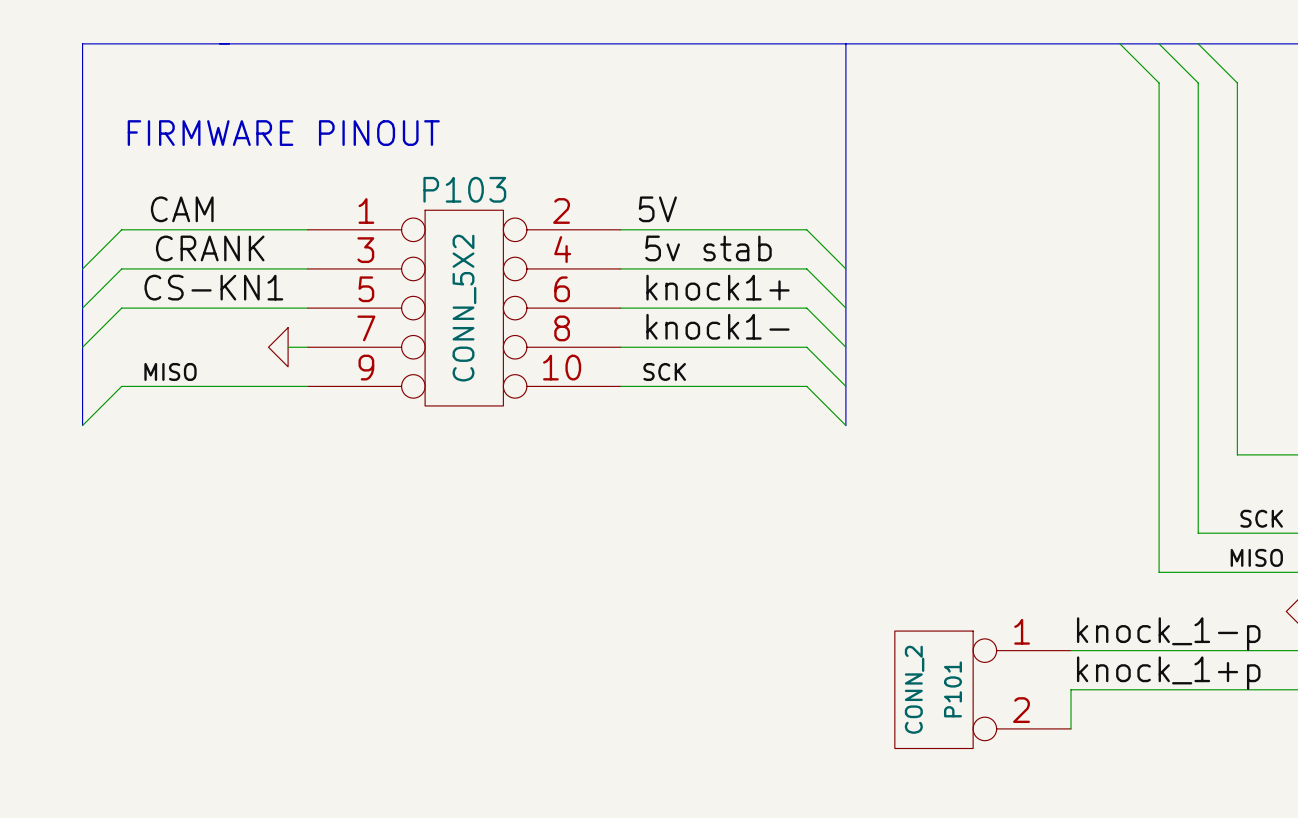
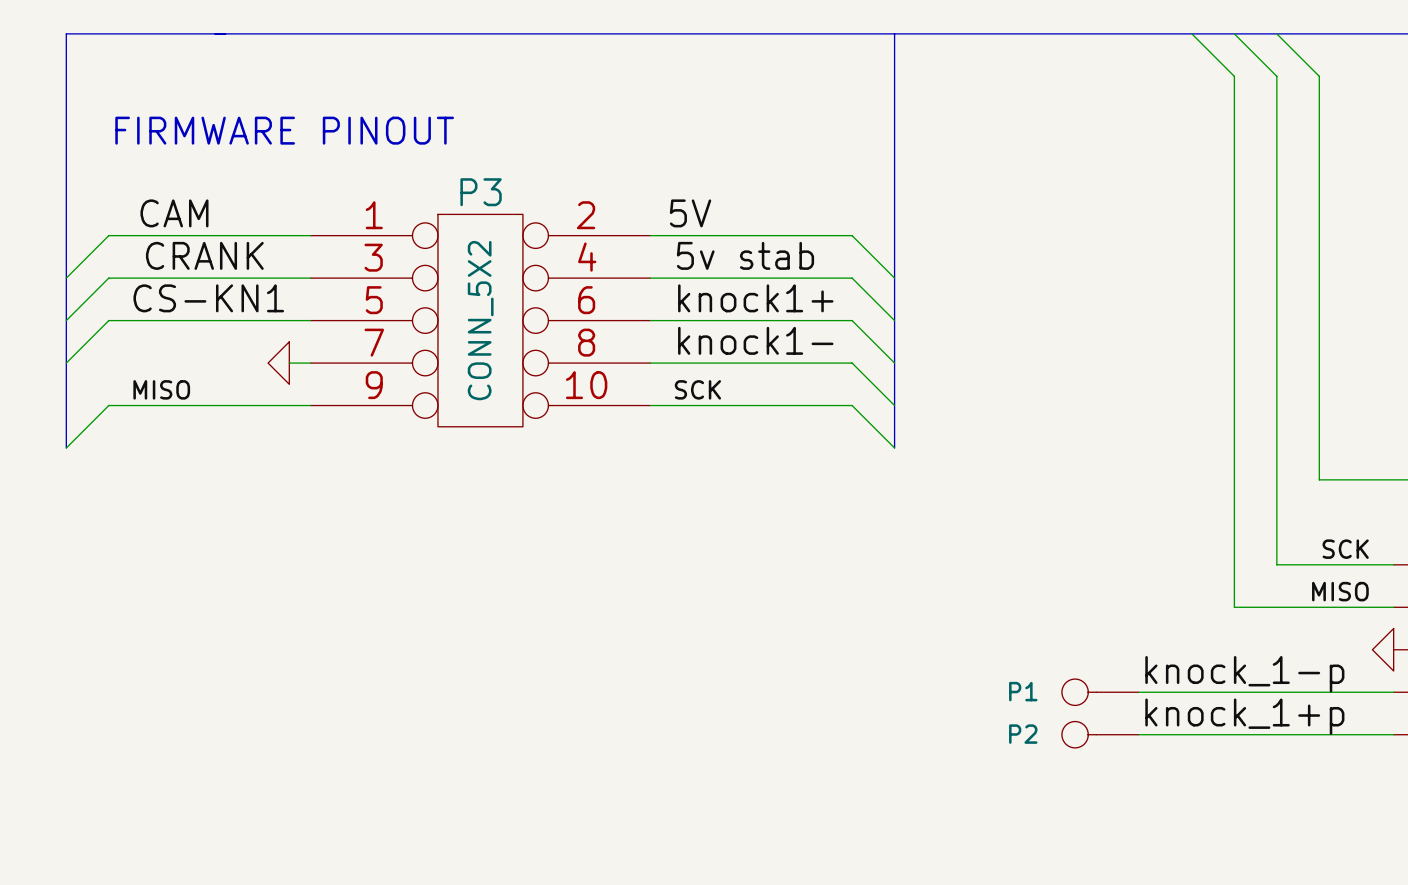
P103 name: P103 (464, 189) -> P3 (481, 192)
P1: none -> (1100, 692)
P101: CONN_2 (982, 689) -> none
P2: none -> (1100, 734)
wire: (1071, 689) (1071, 728) -> none

